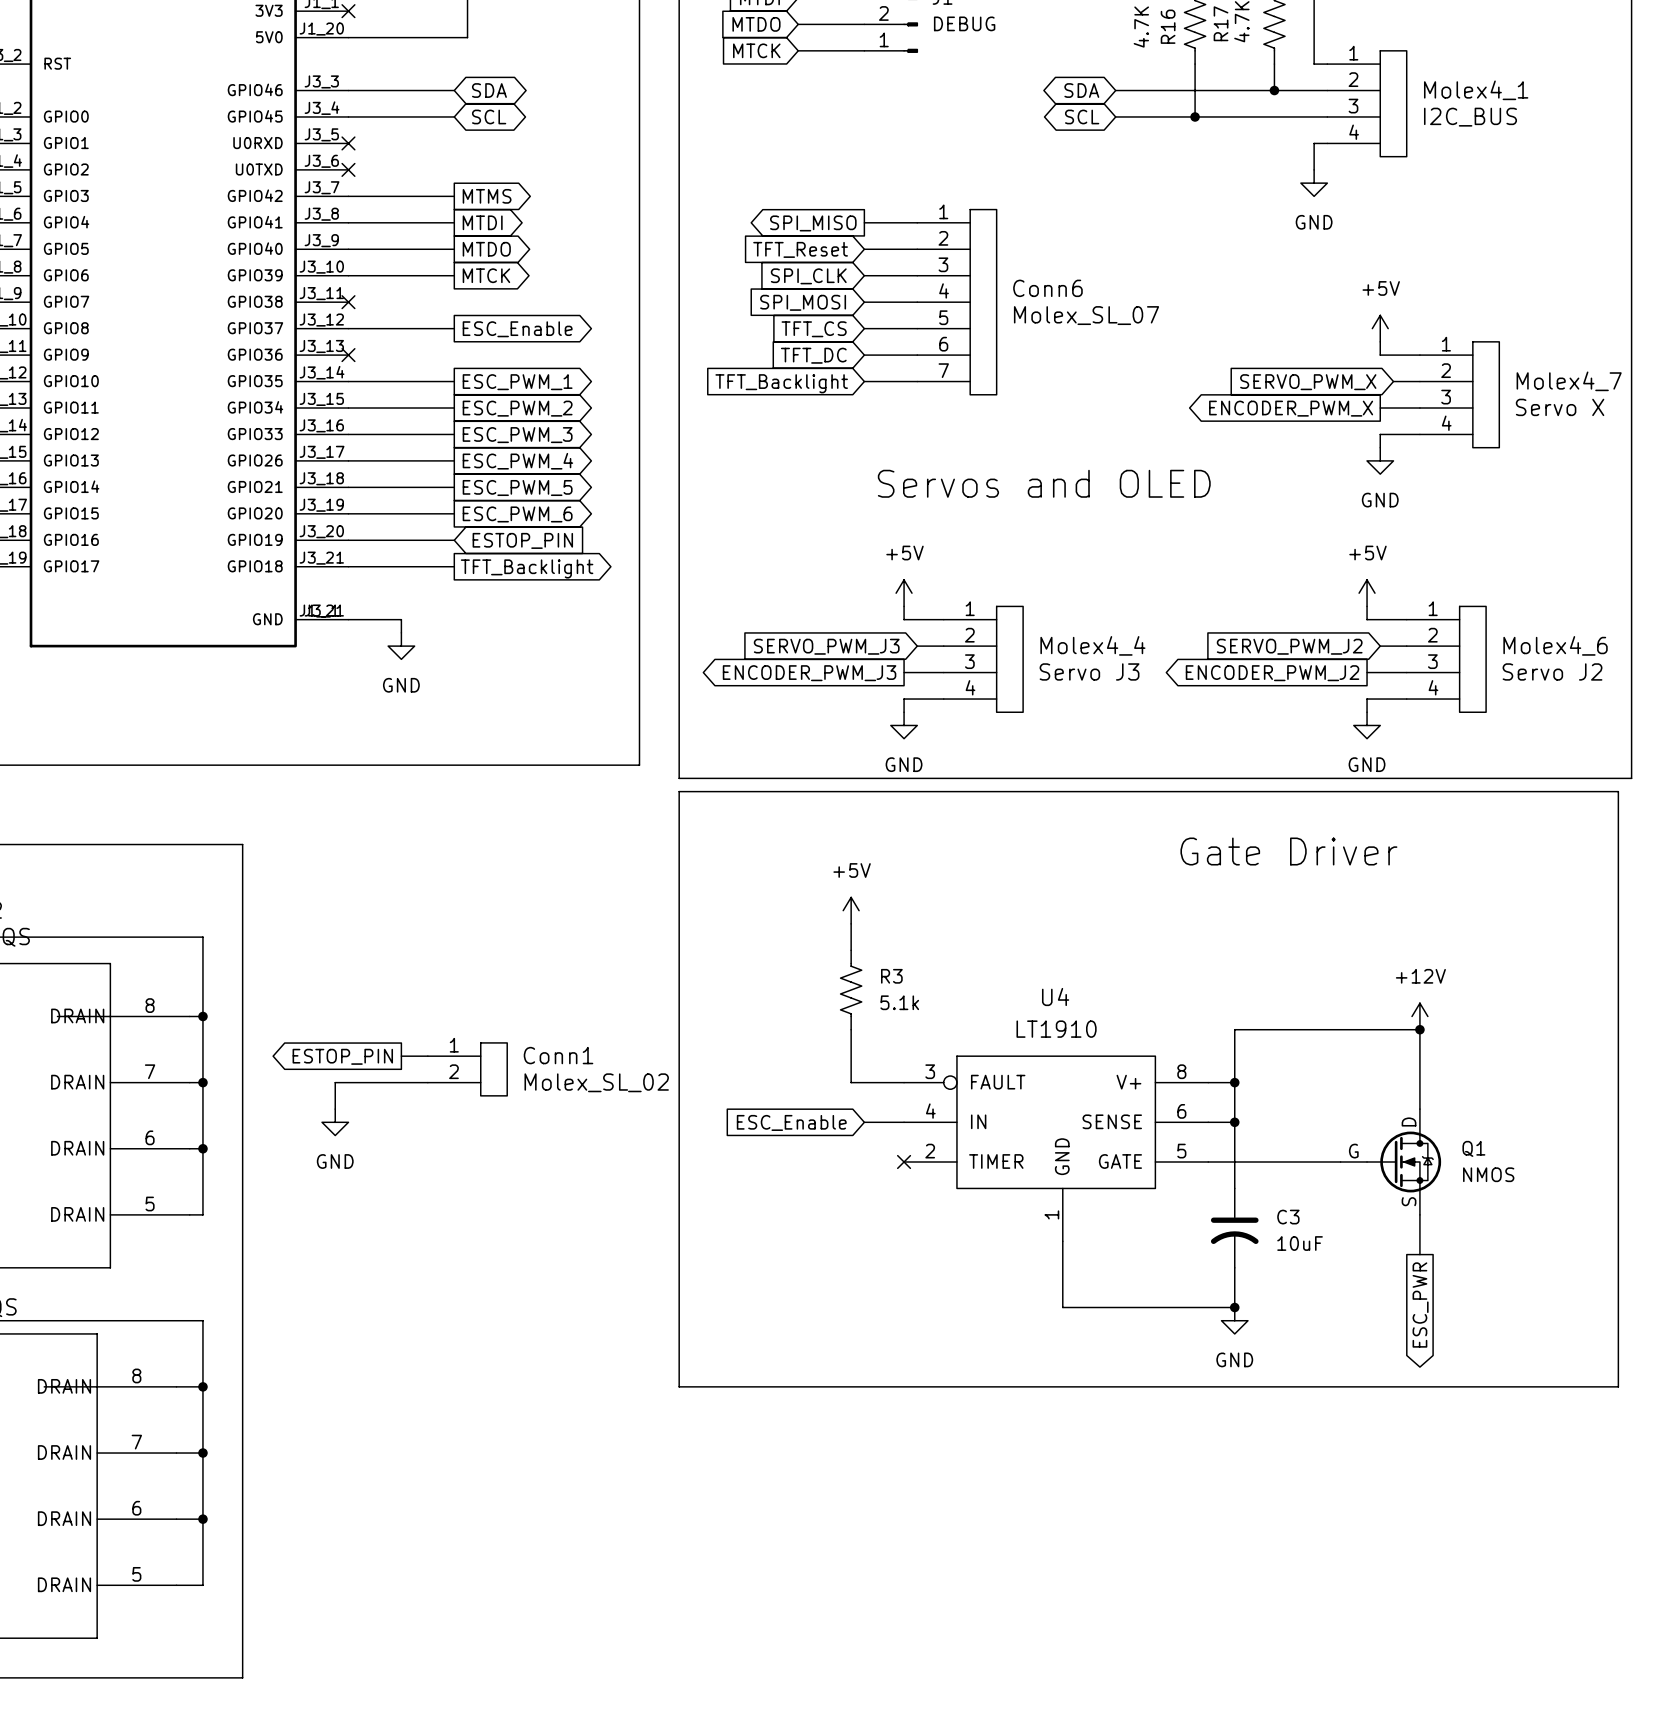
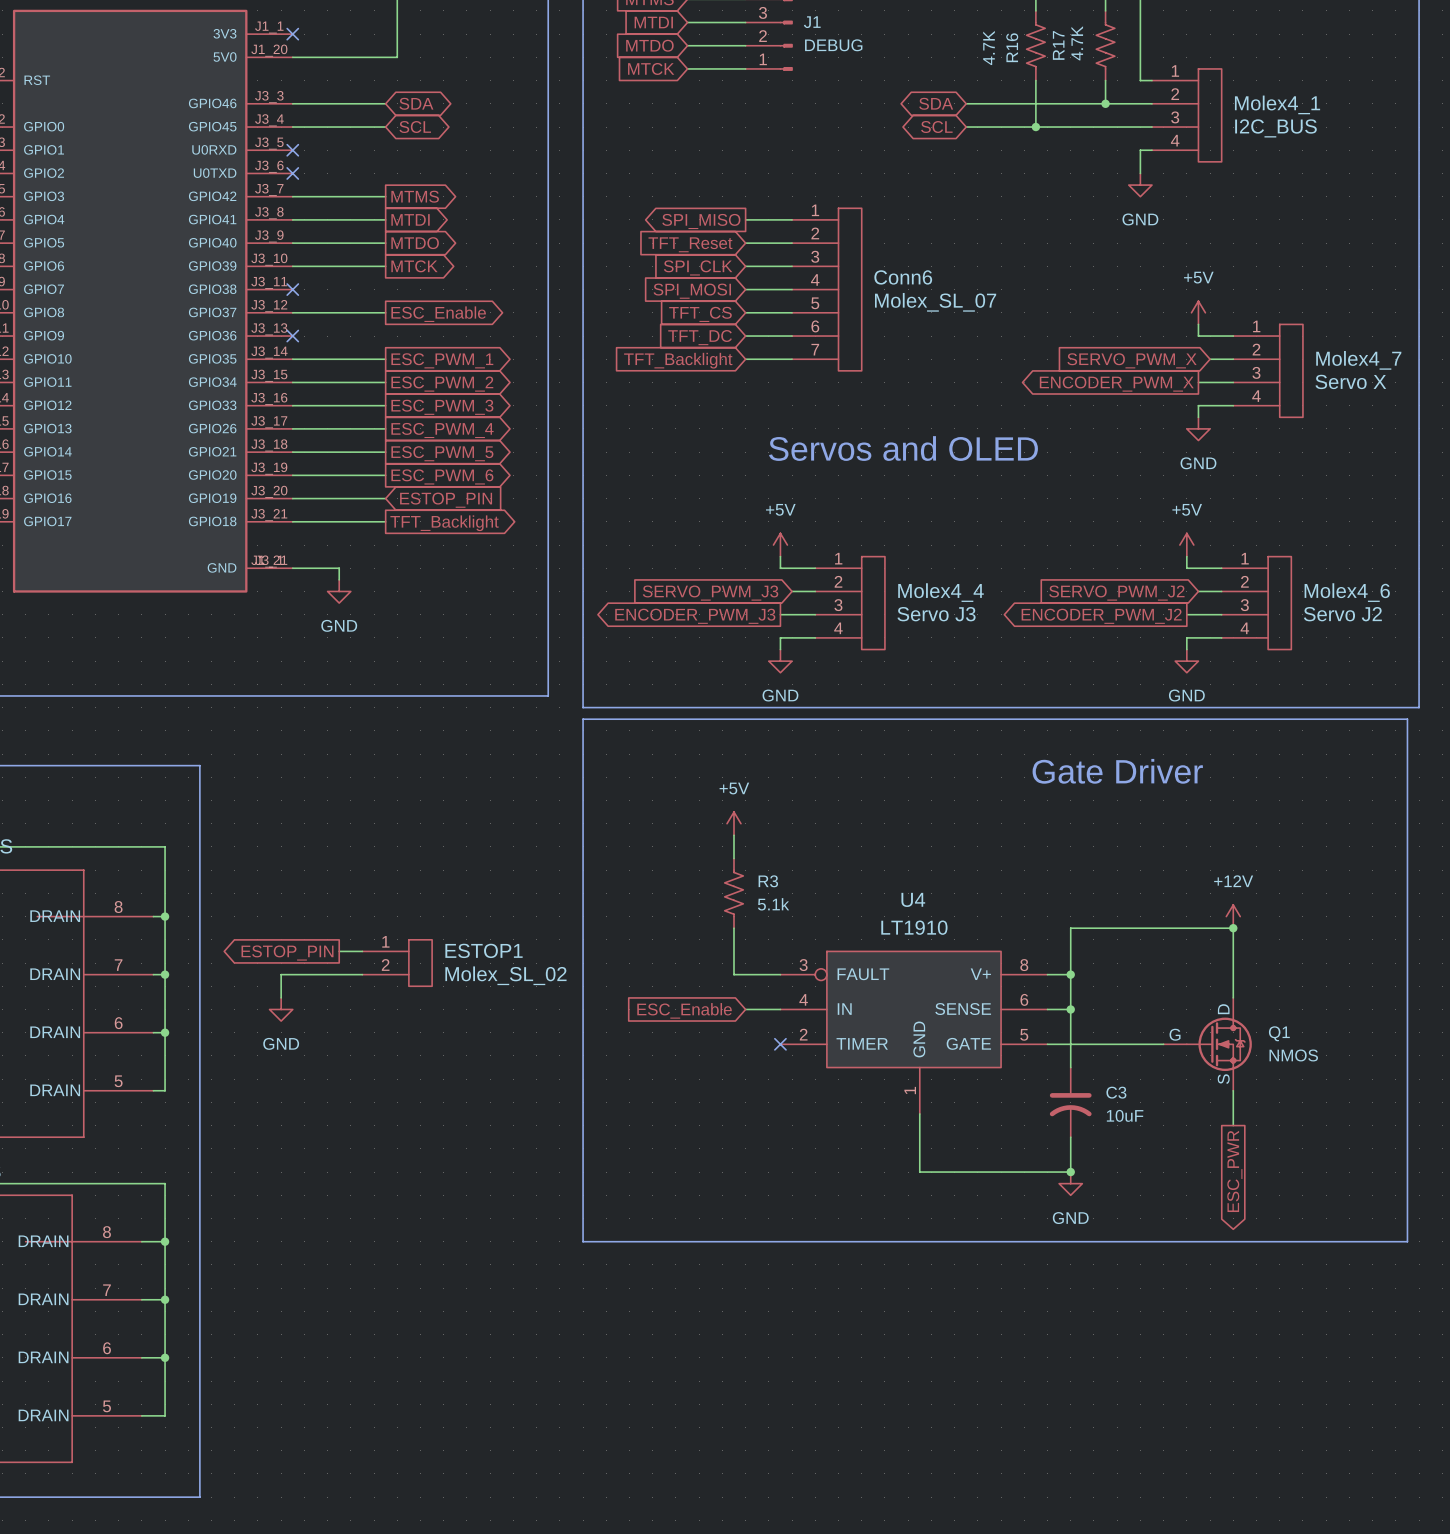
Conn1 name: Conn1 (558, 1055) -> ESTOP1 (484, 950)

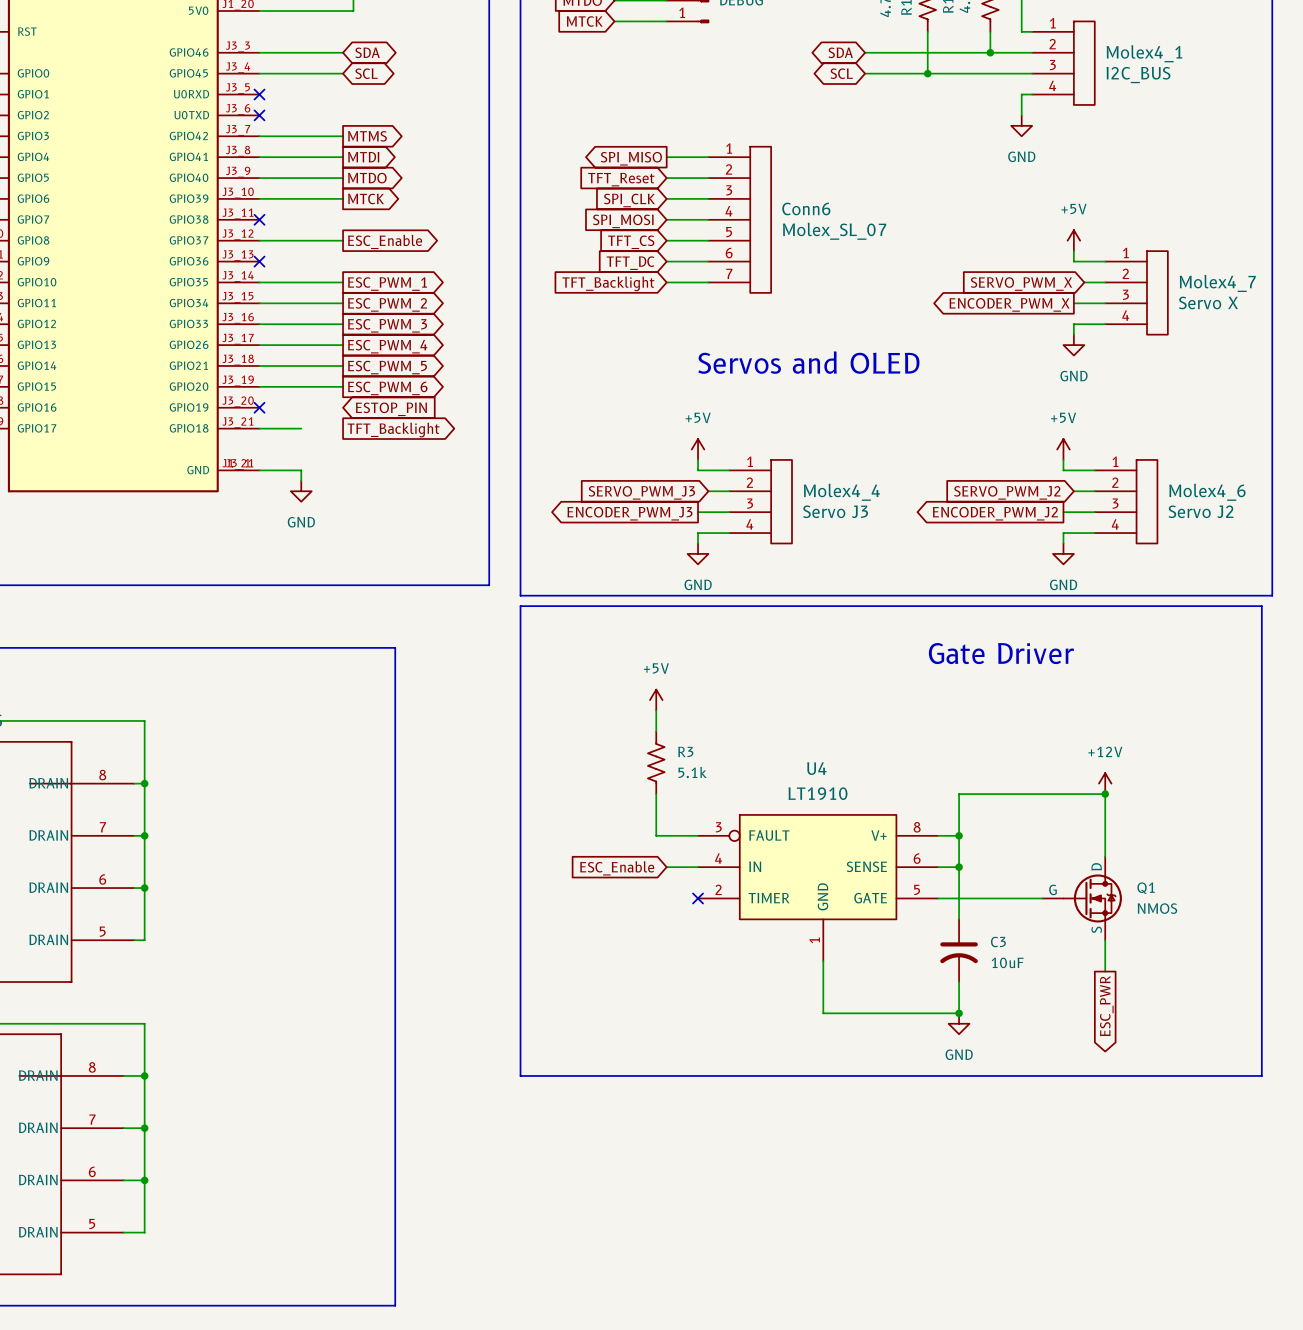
wire: (292, 498) (385, 498) -> none
no-connect mark: none -> (259, 407)
wire: (339, 521) (385, 521) -> none
line: (199, 765) (199, 1497) -> (175, 647) (395, 647) (395, 1305) (175, 1305)
wire: (339, 951) (362, 951) -> none
global label: ESTOP_PIN (287, 953) -> none
ESTOP1: Molex_SL_02 (397, 963) -> none
wire: (362, 974) (281, 974) (281, 997) -> none
power symbol: GND (281, 1009) -> none

